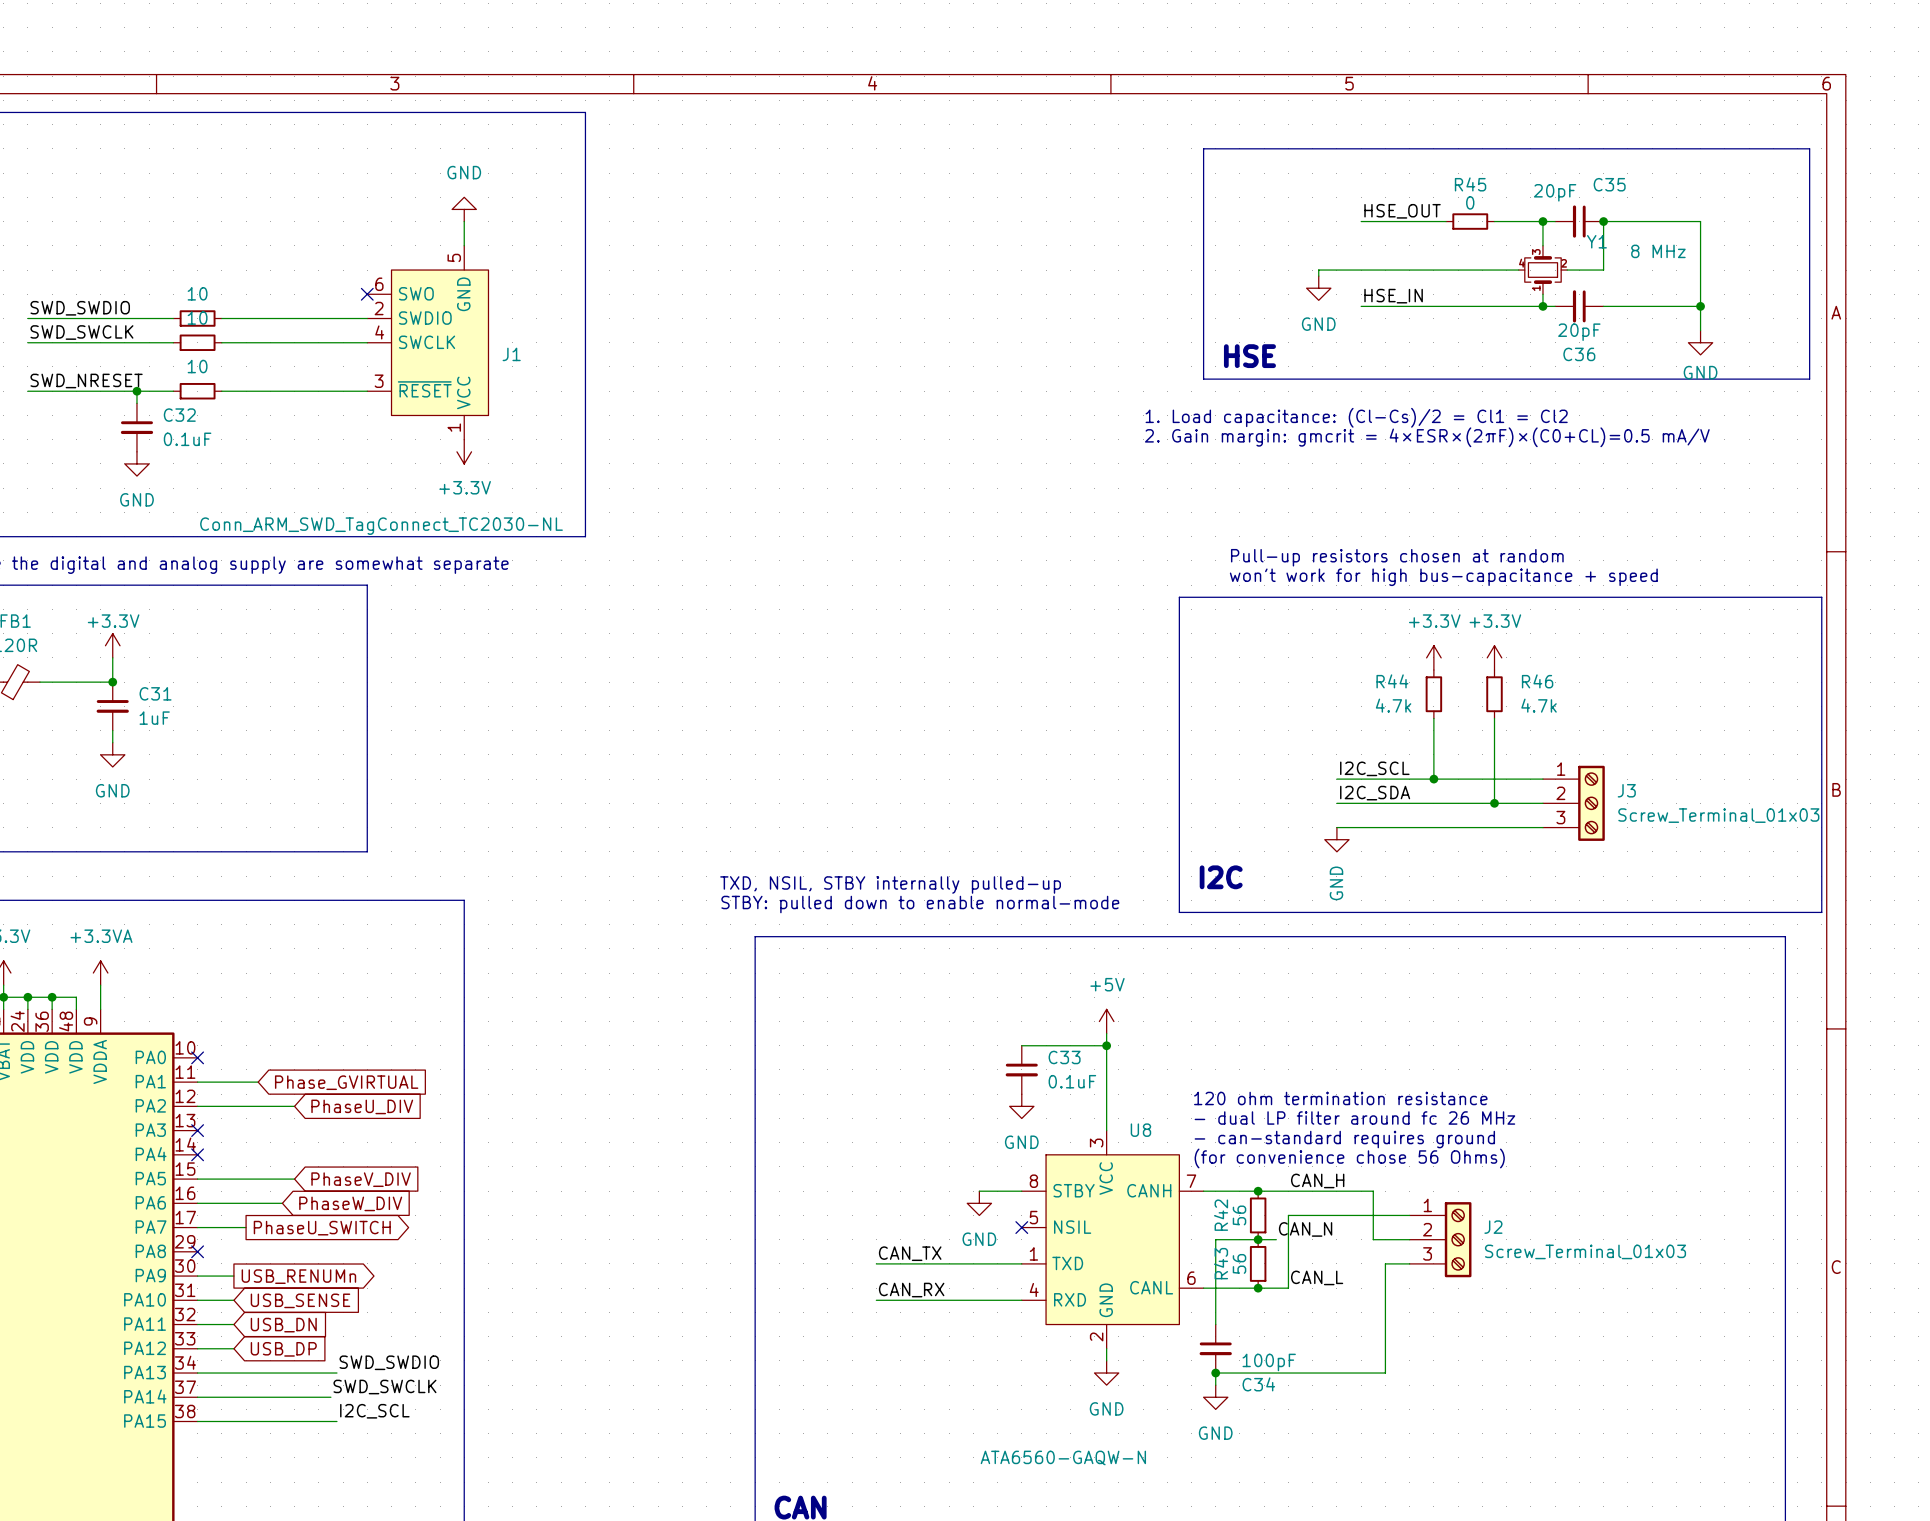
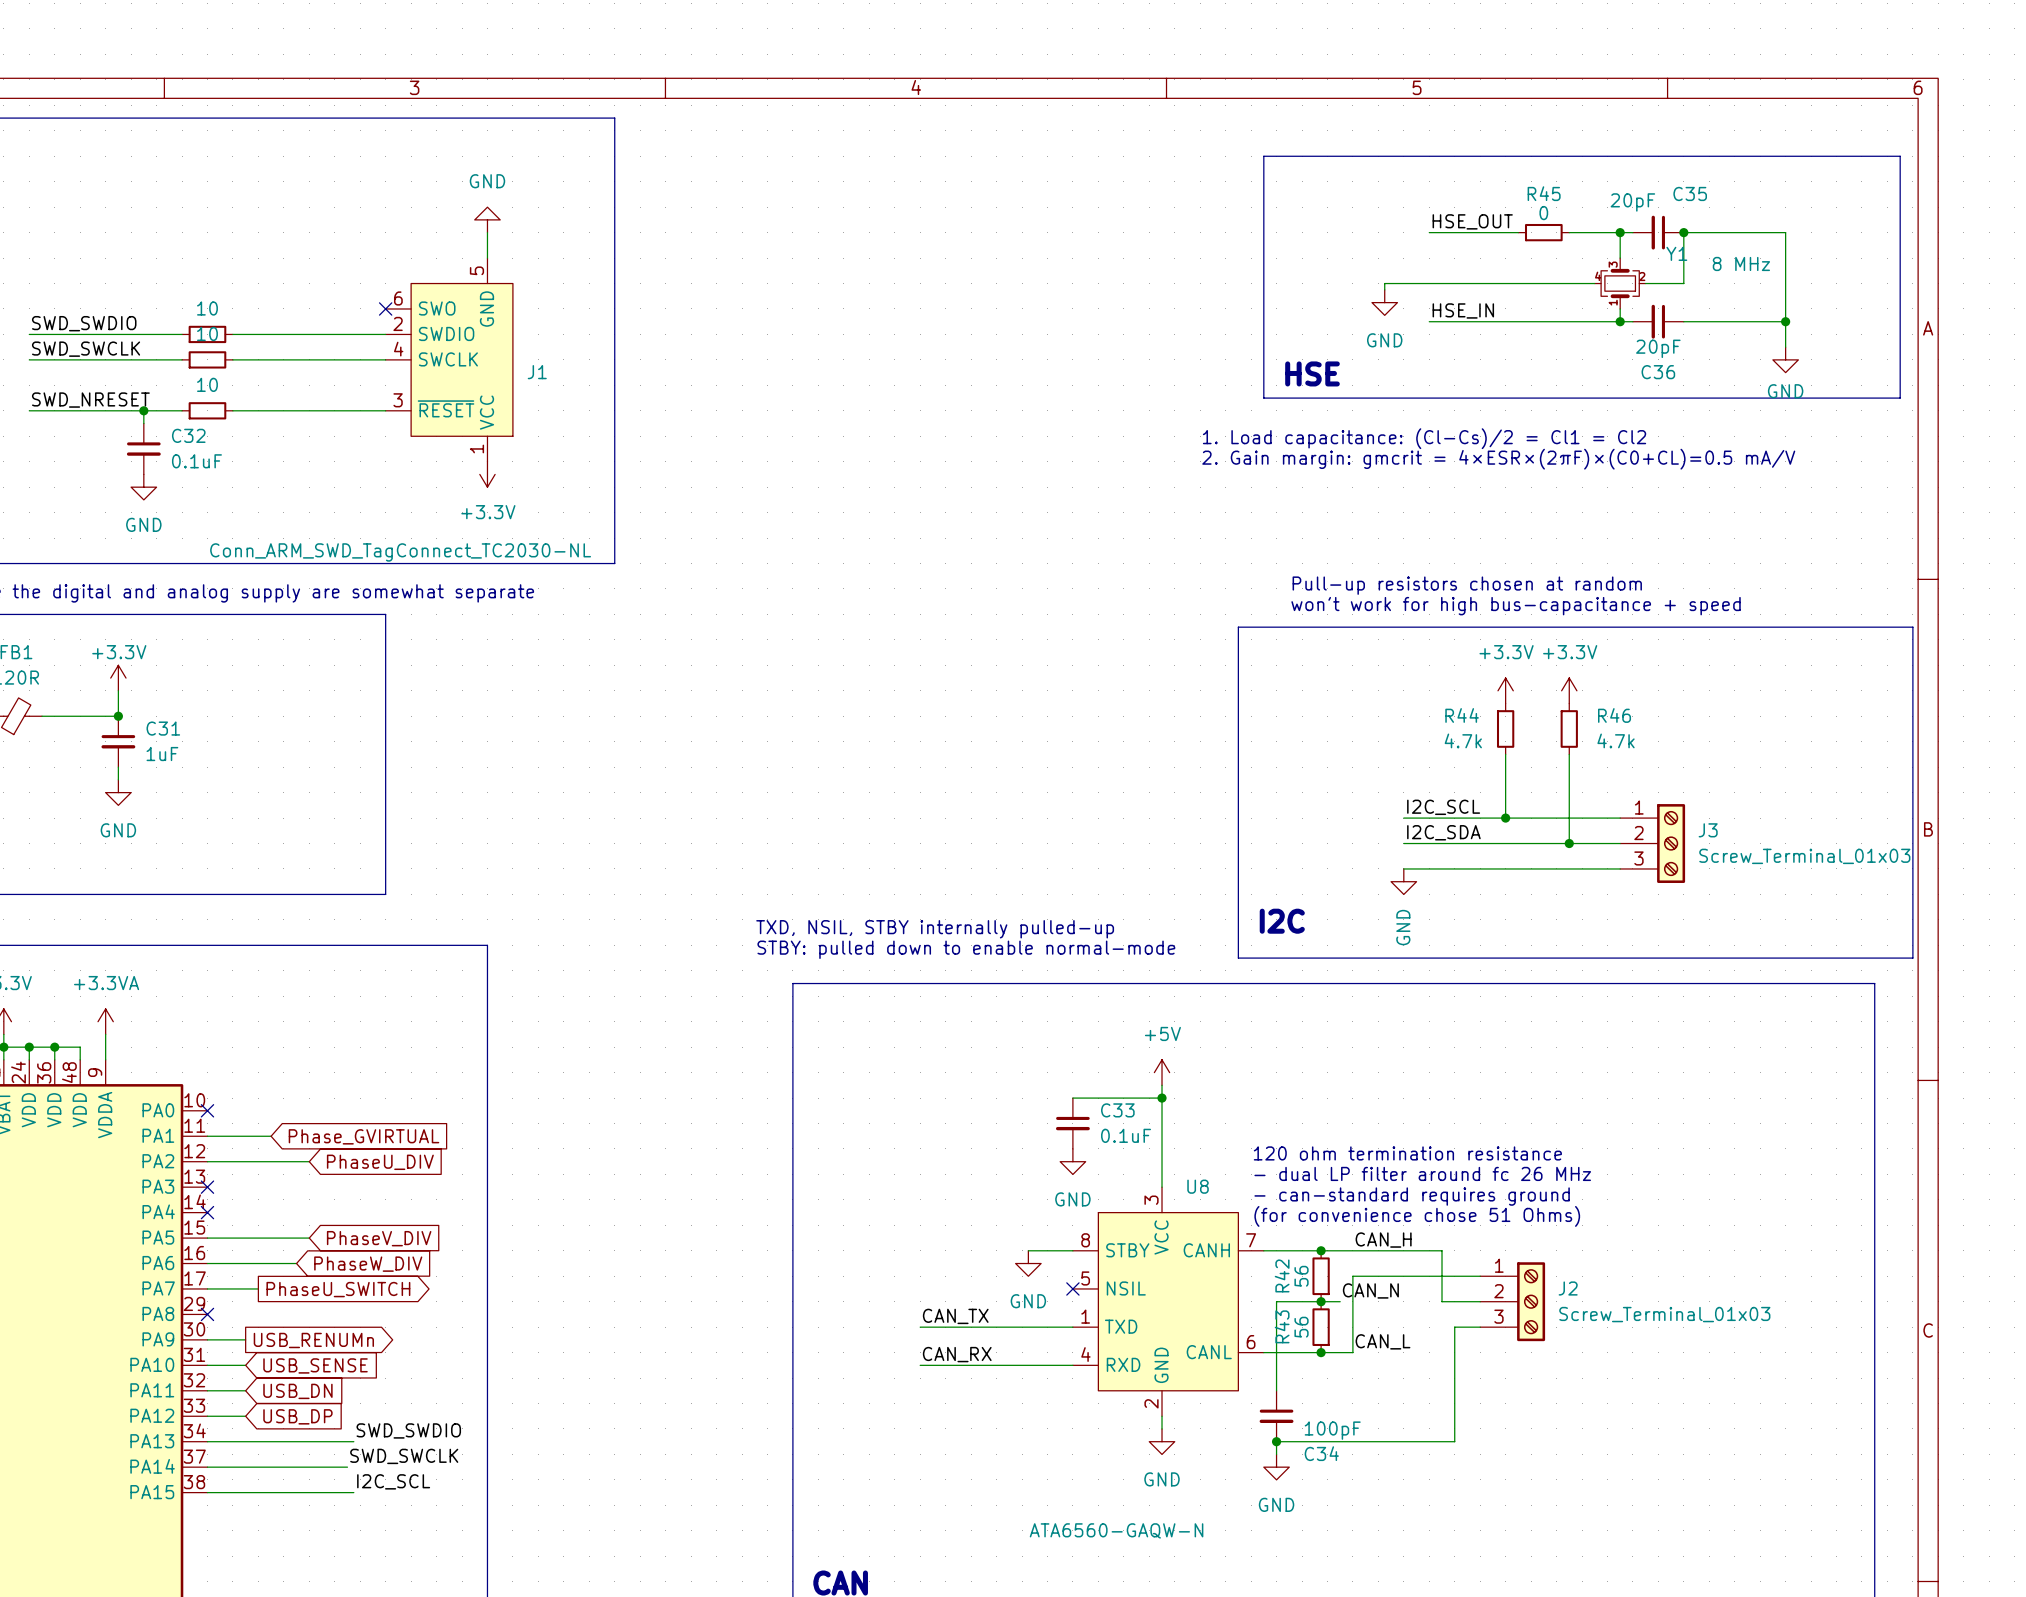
text: (for convenience chose 56 Ohms) (1349, 1158) -> (for convenience chose 51 Ohms) (1417, 1216)

